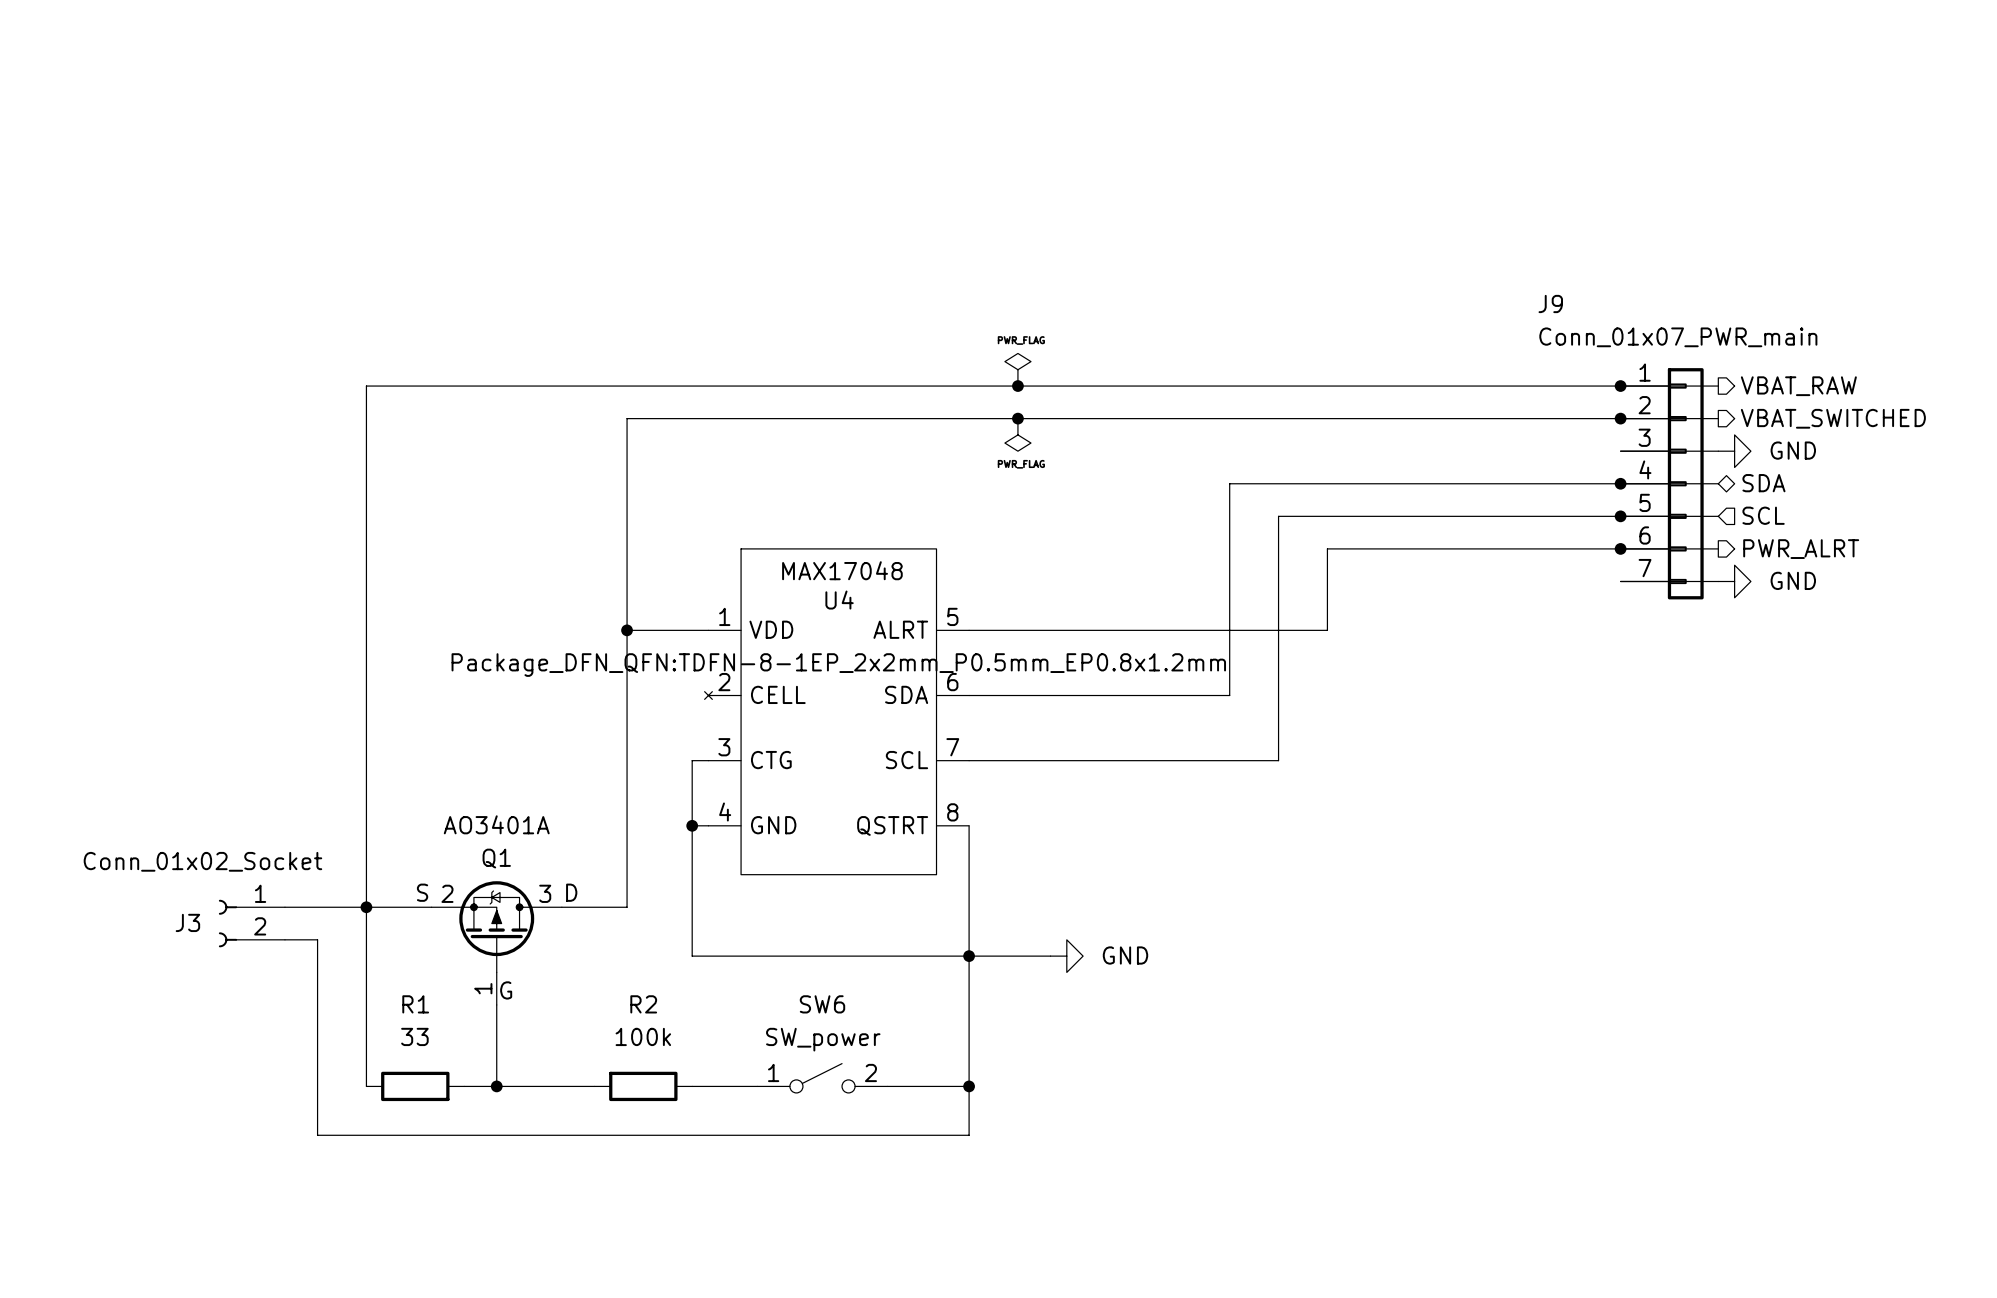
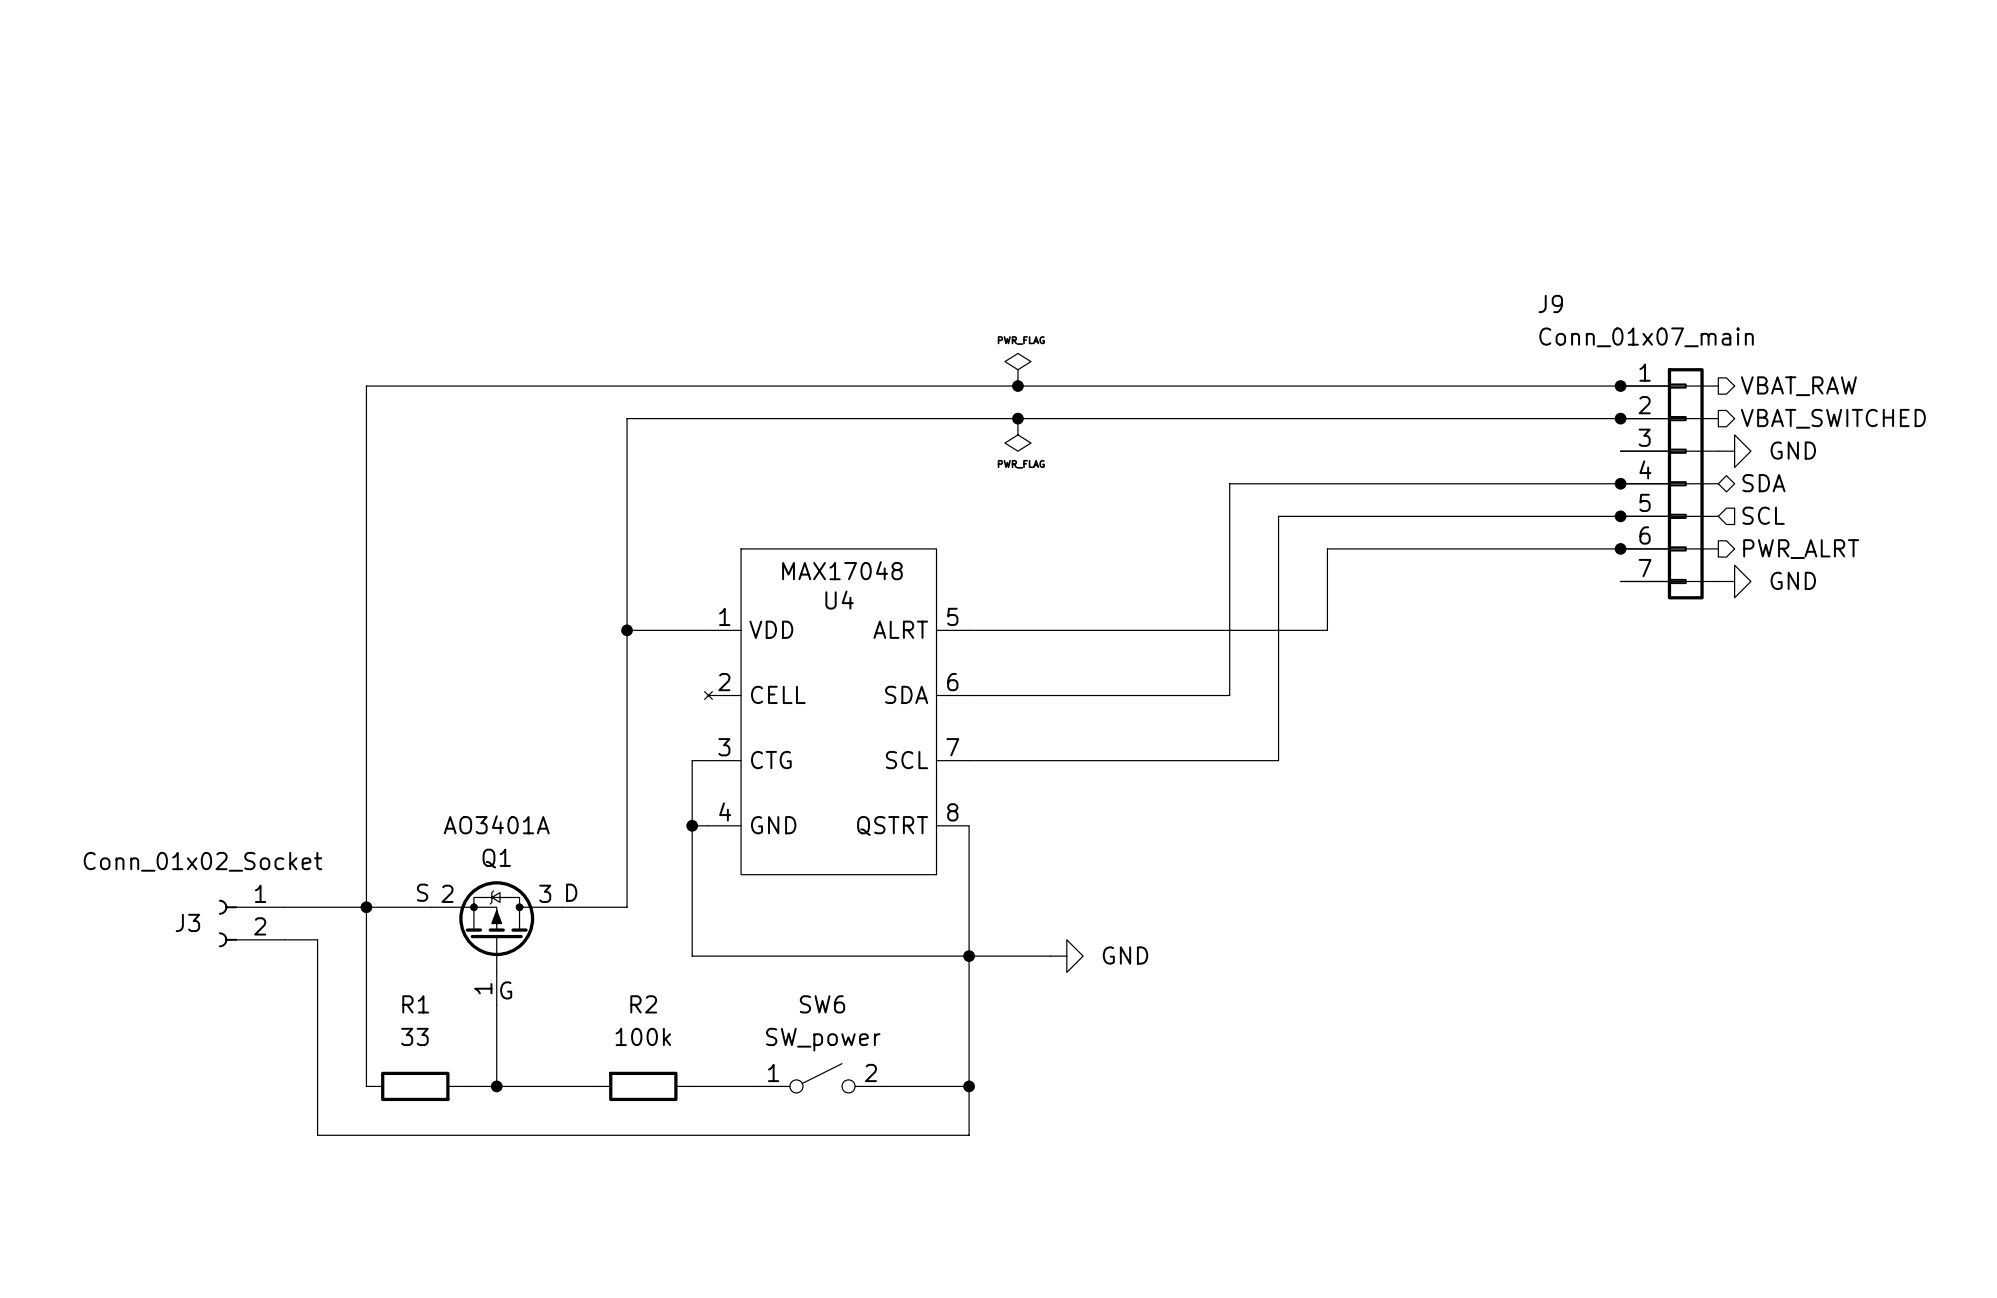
J9 value: Conn_01x07_PWR_main (1678, 337) -> Conn_01x07_main (1646, 337)
U4 text: Package_DFN_QFN:TDFN-8-1EP_2x2mm_P0.5mm_EP0.8x1.2mm (838, 665) -> none

